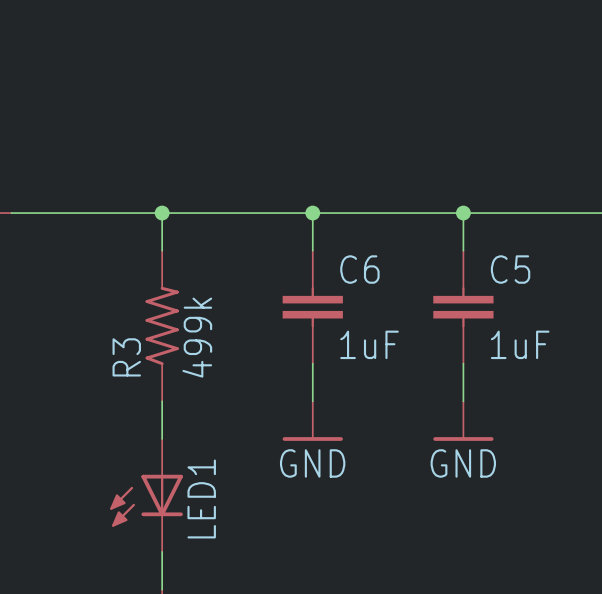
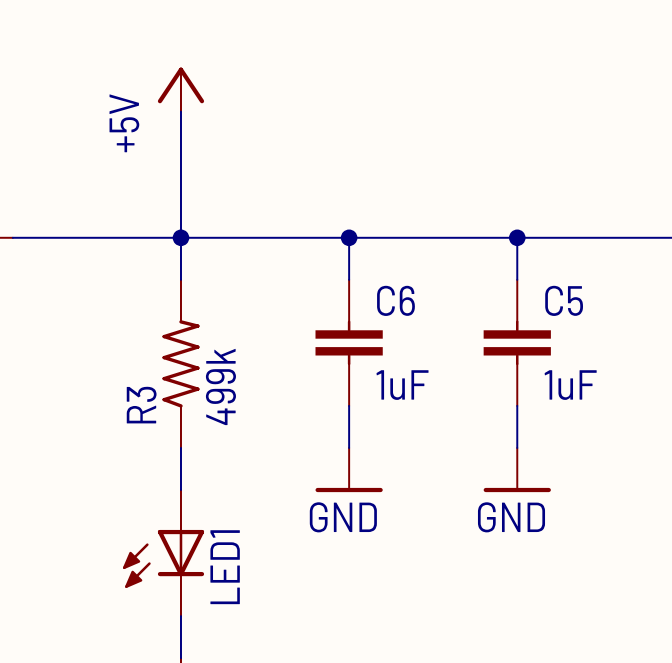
power symbol: none -> +5V (180, 89)
wire: none -> (180, 111) (180, 237)

